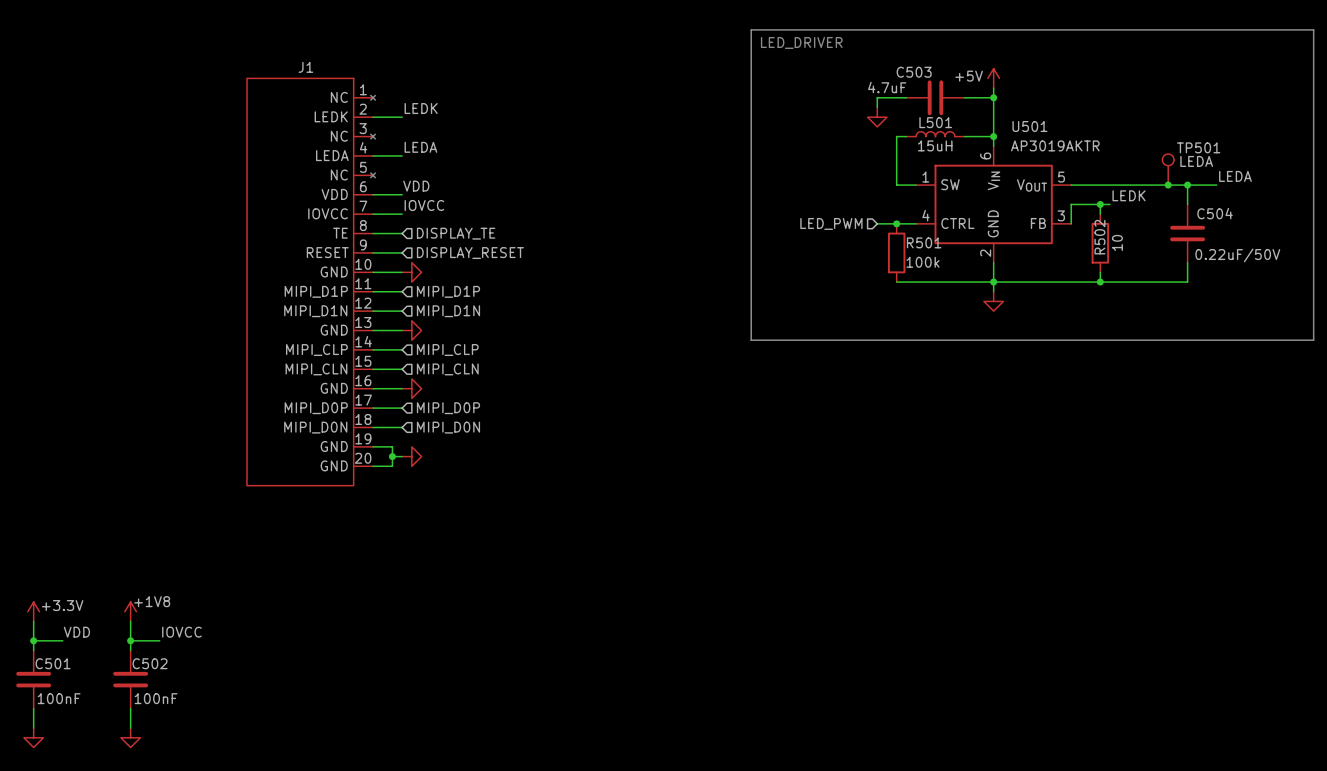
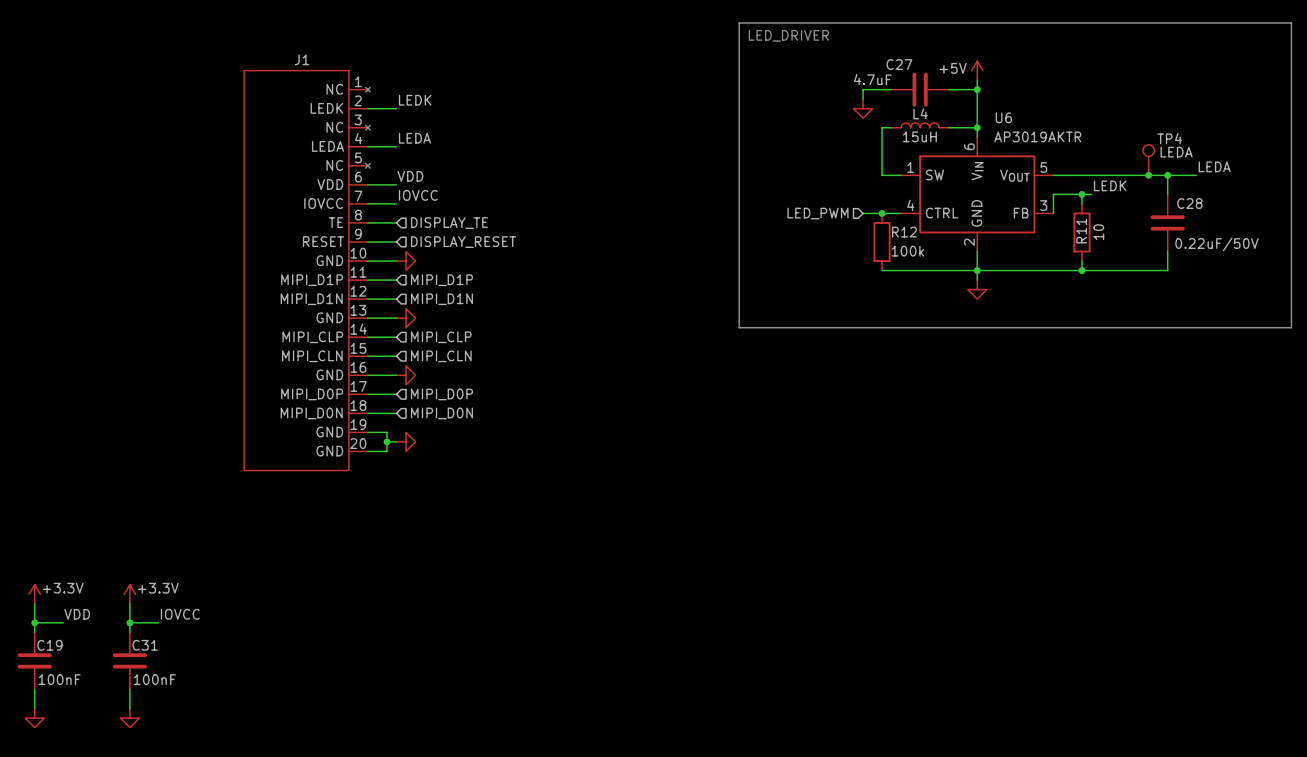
C503 name: C503 (914, 72) -> C27 (899, 64)
L501 name: L501 (935, 122) -> L4 (920, 113)
U501 name: U501 (1029, 126) -> U6 (1003, 117)
TP501 name: TP501 (1198, 147) -> TP4 (1169, 138)
C504 name: C504 (1215, 213) -> C28 (1189, 203)
R502 name: R502 (1099, 237) -> R11 (1081, 230)
R501 name: R501 (924, 242) -> R12 (904, 232)
power symbol: +1V8 (130, 611) -> +3.3V (129, 594)
C501 name: C501 (53, 663) -> C19 (49, 645)
C502 name: C502 (150, 663) -> C31 (145, 645)

